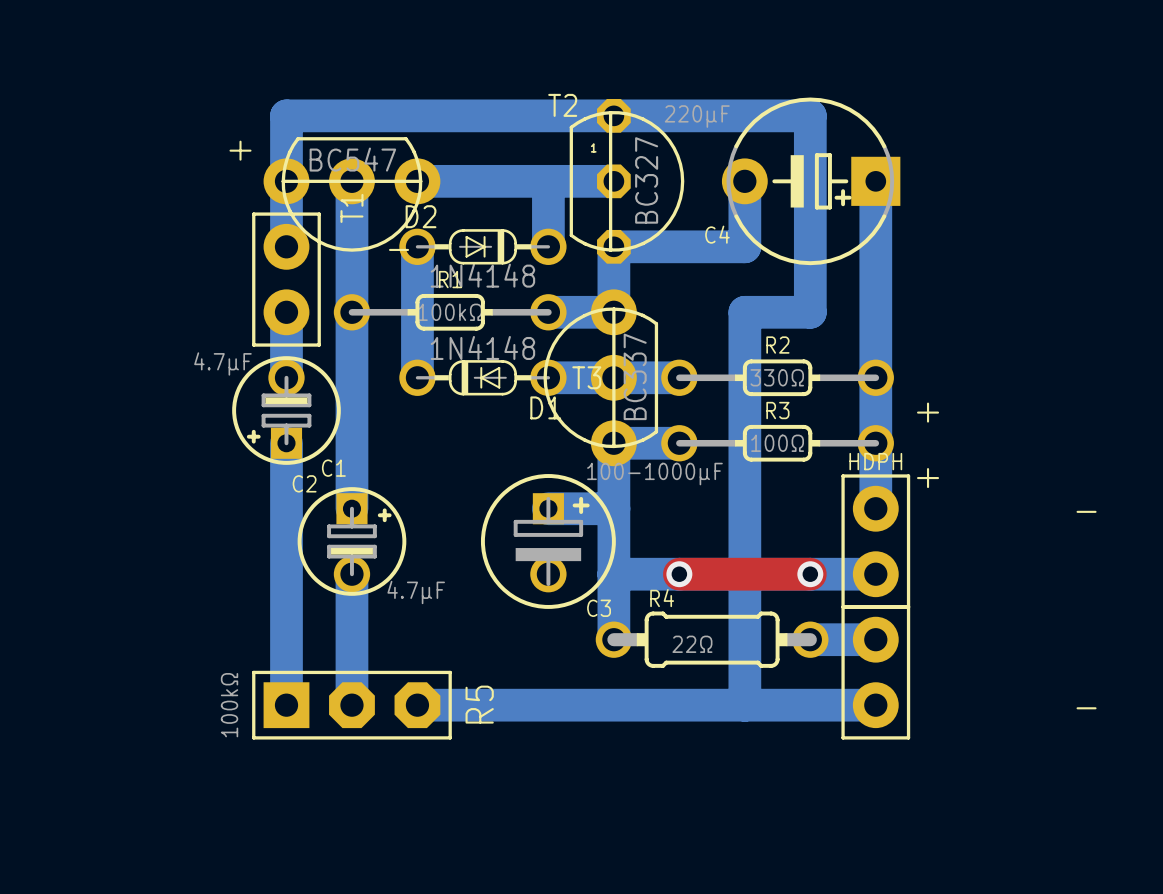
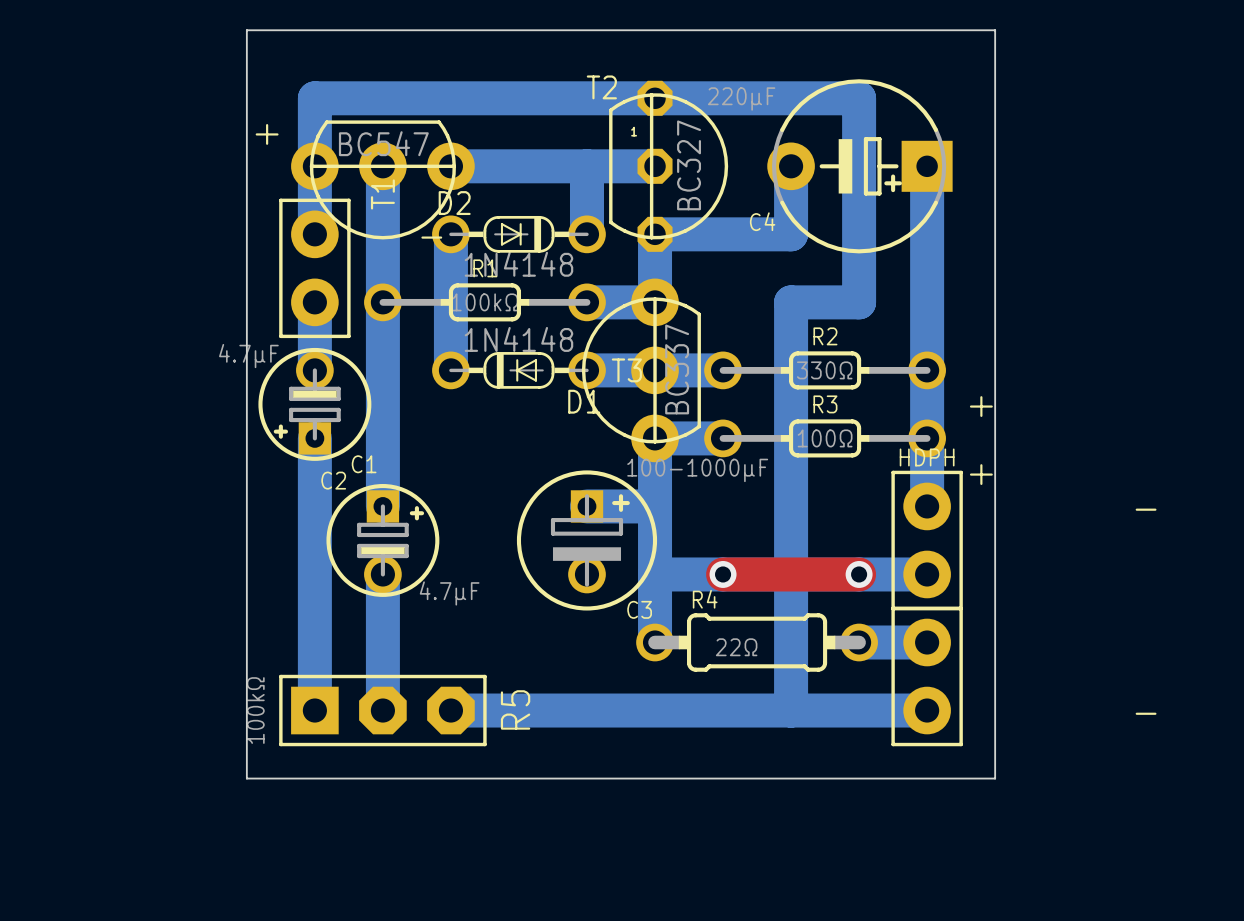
board edge: none -> (246, 30) (995, 30) (995, 778) (246, 778) (246, 30)

